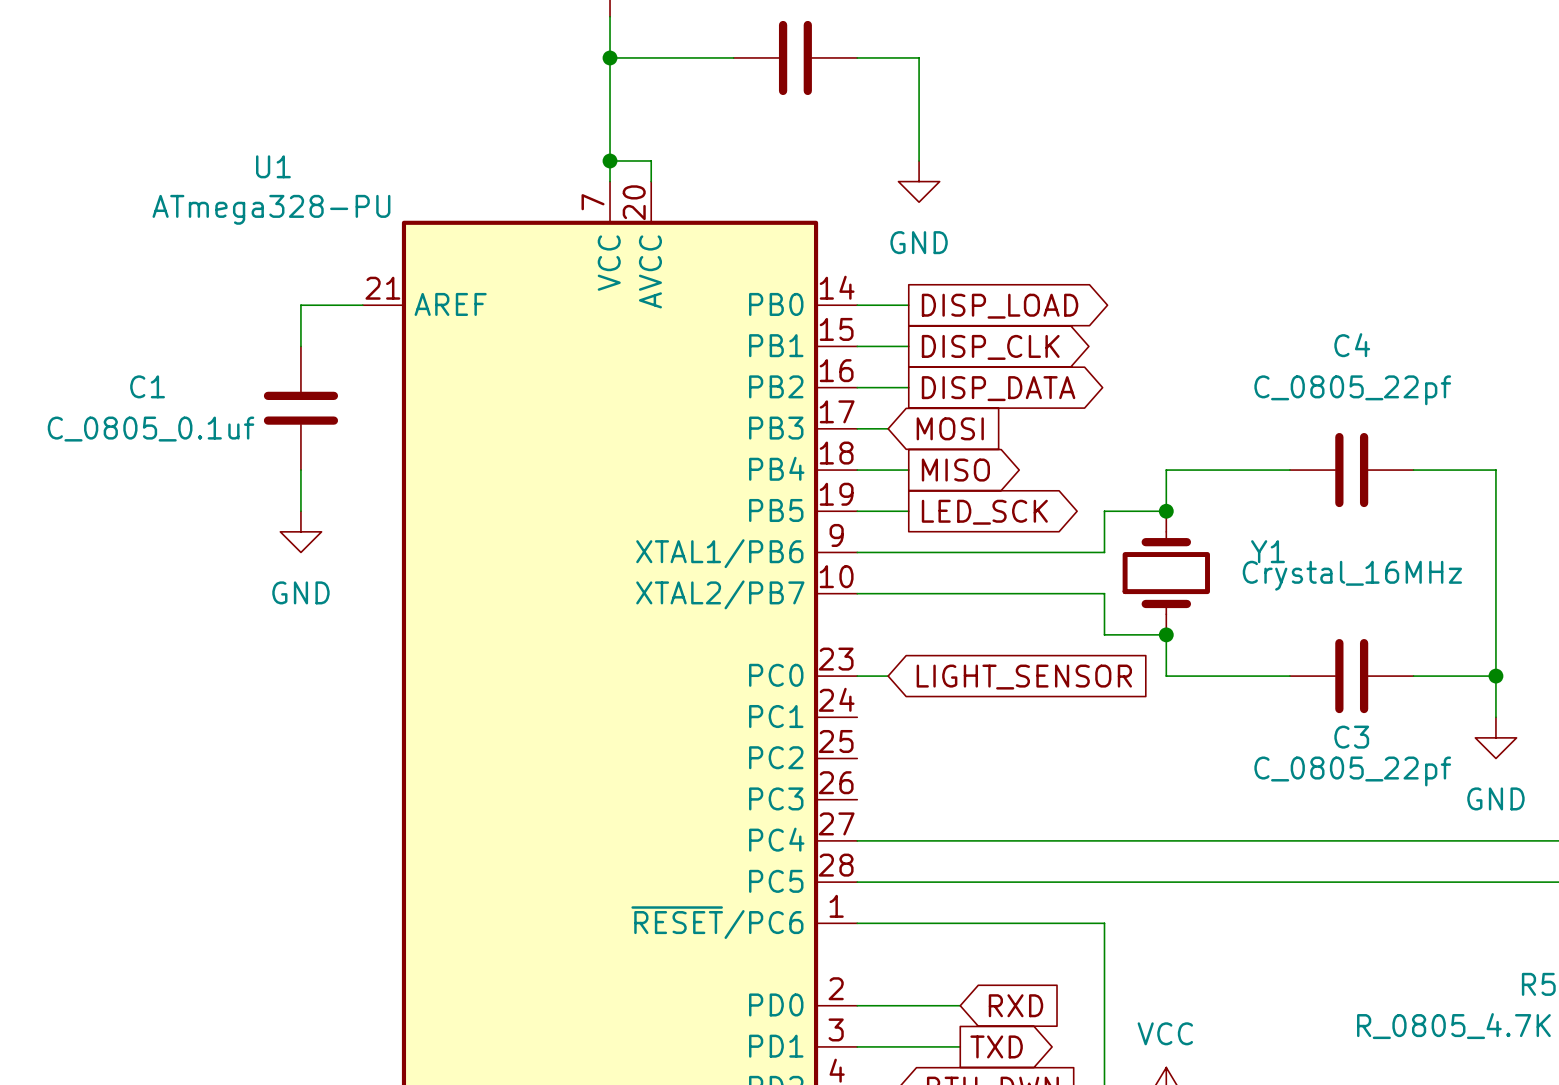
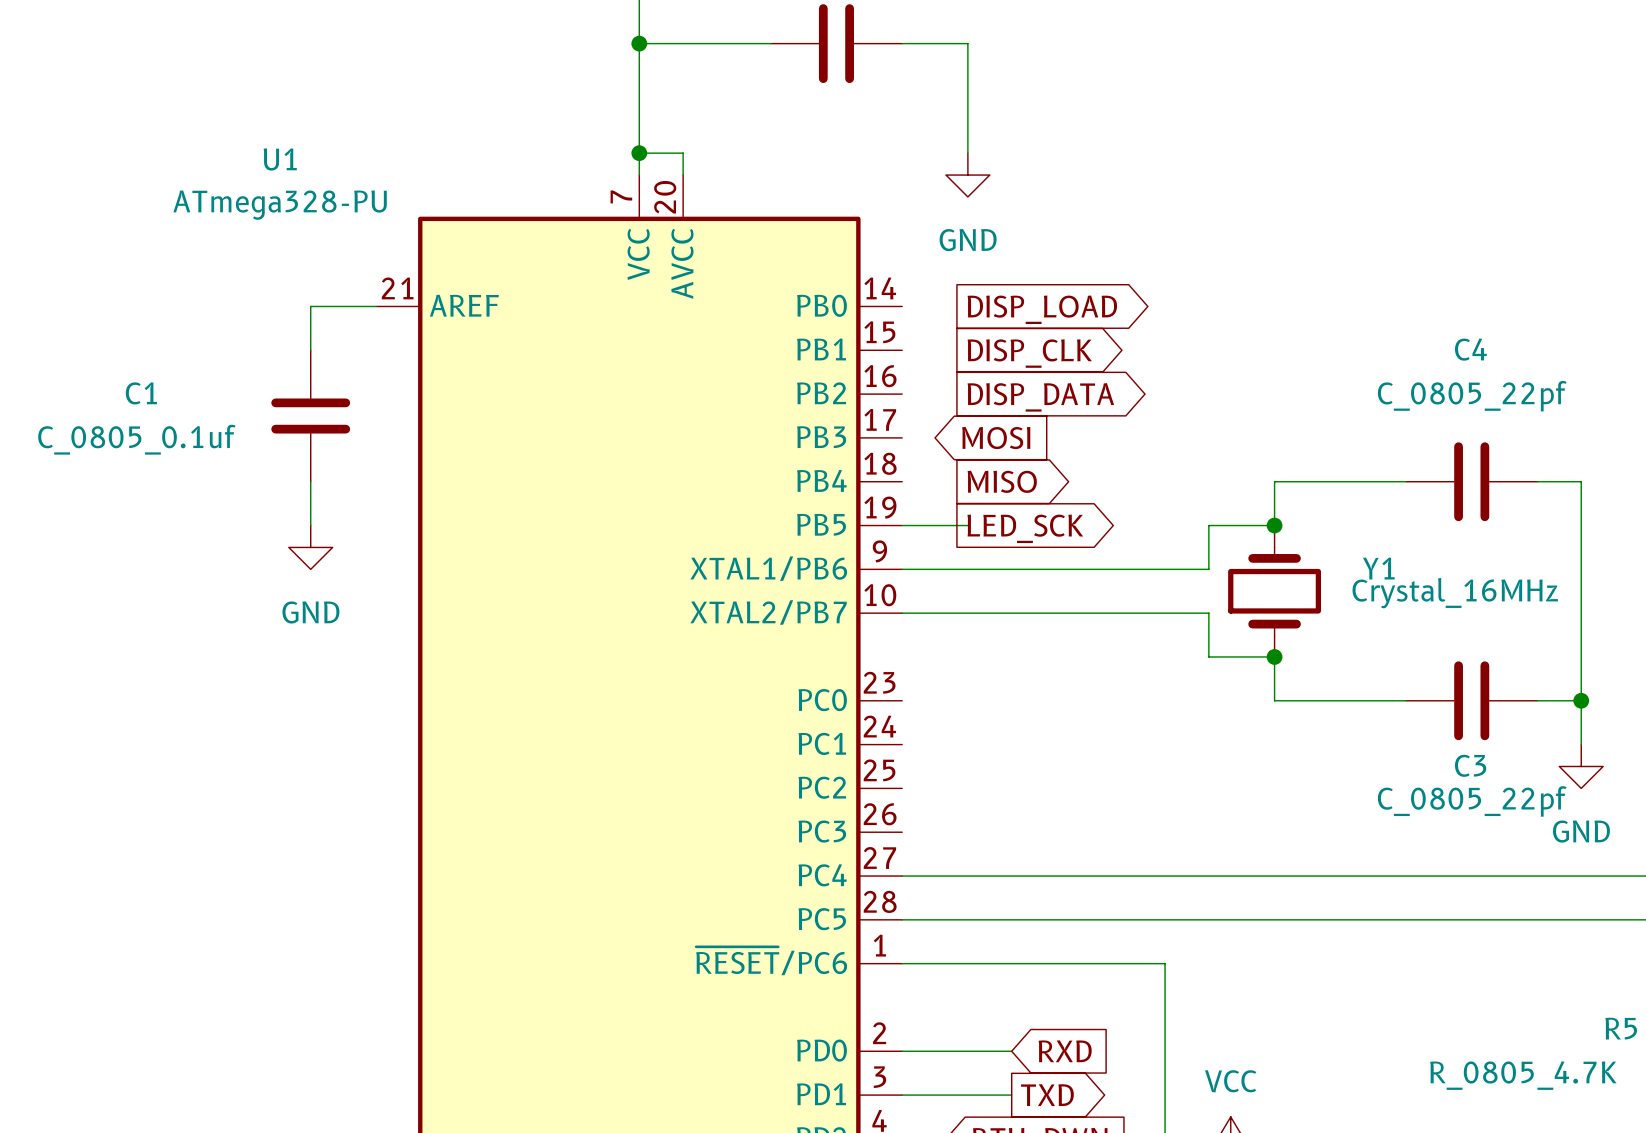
wire: (857, 305) (908, 305) -> none
wire: (857, 346) (908, 346) -> none
wire: (857, 387) (908, 387) -> none
wire: (857, 428) (888, 428) -> none
wire: (857, 470) (908, 470) -> none
wire: (1207, 470) (1166, 470) (1166, 511) -> (1274, 481) (1274, 525) (1230, 525)
C4 position: (1351, 470) -> (1471, 481)
wire: none -> (956, 525) (967, 525)
wire: (1145, 511) (1104, 511) (1104, 552) -> (1208, 525) (1208, 569) (1165, 569)
junction position: (1166, 511) -> (1274, 525)
Y1 position: (1166, 573) -> (1274, 591)
wire: (1104, 593) (1104, 634) (1145, 634) -> (1165, 613) (1208, 613) (1208, 656)
wire: (1166, 634) (1166, 676) (1207, 676) -> (1230, 656) (1274, 656) (1274, 700)
junction position: (1166, 634) -> (1274, 656)
wire: (857, 676) (888, 676) -> none
C3 position: (1351, 676) -> (1471, 700)
global label: LIGHT_SENSOR (1024, 677) -> none

